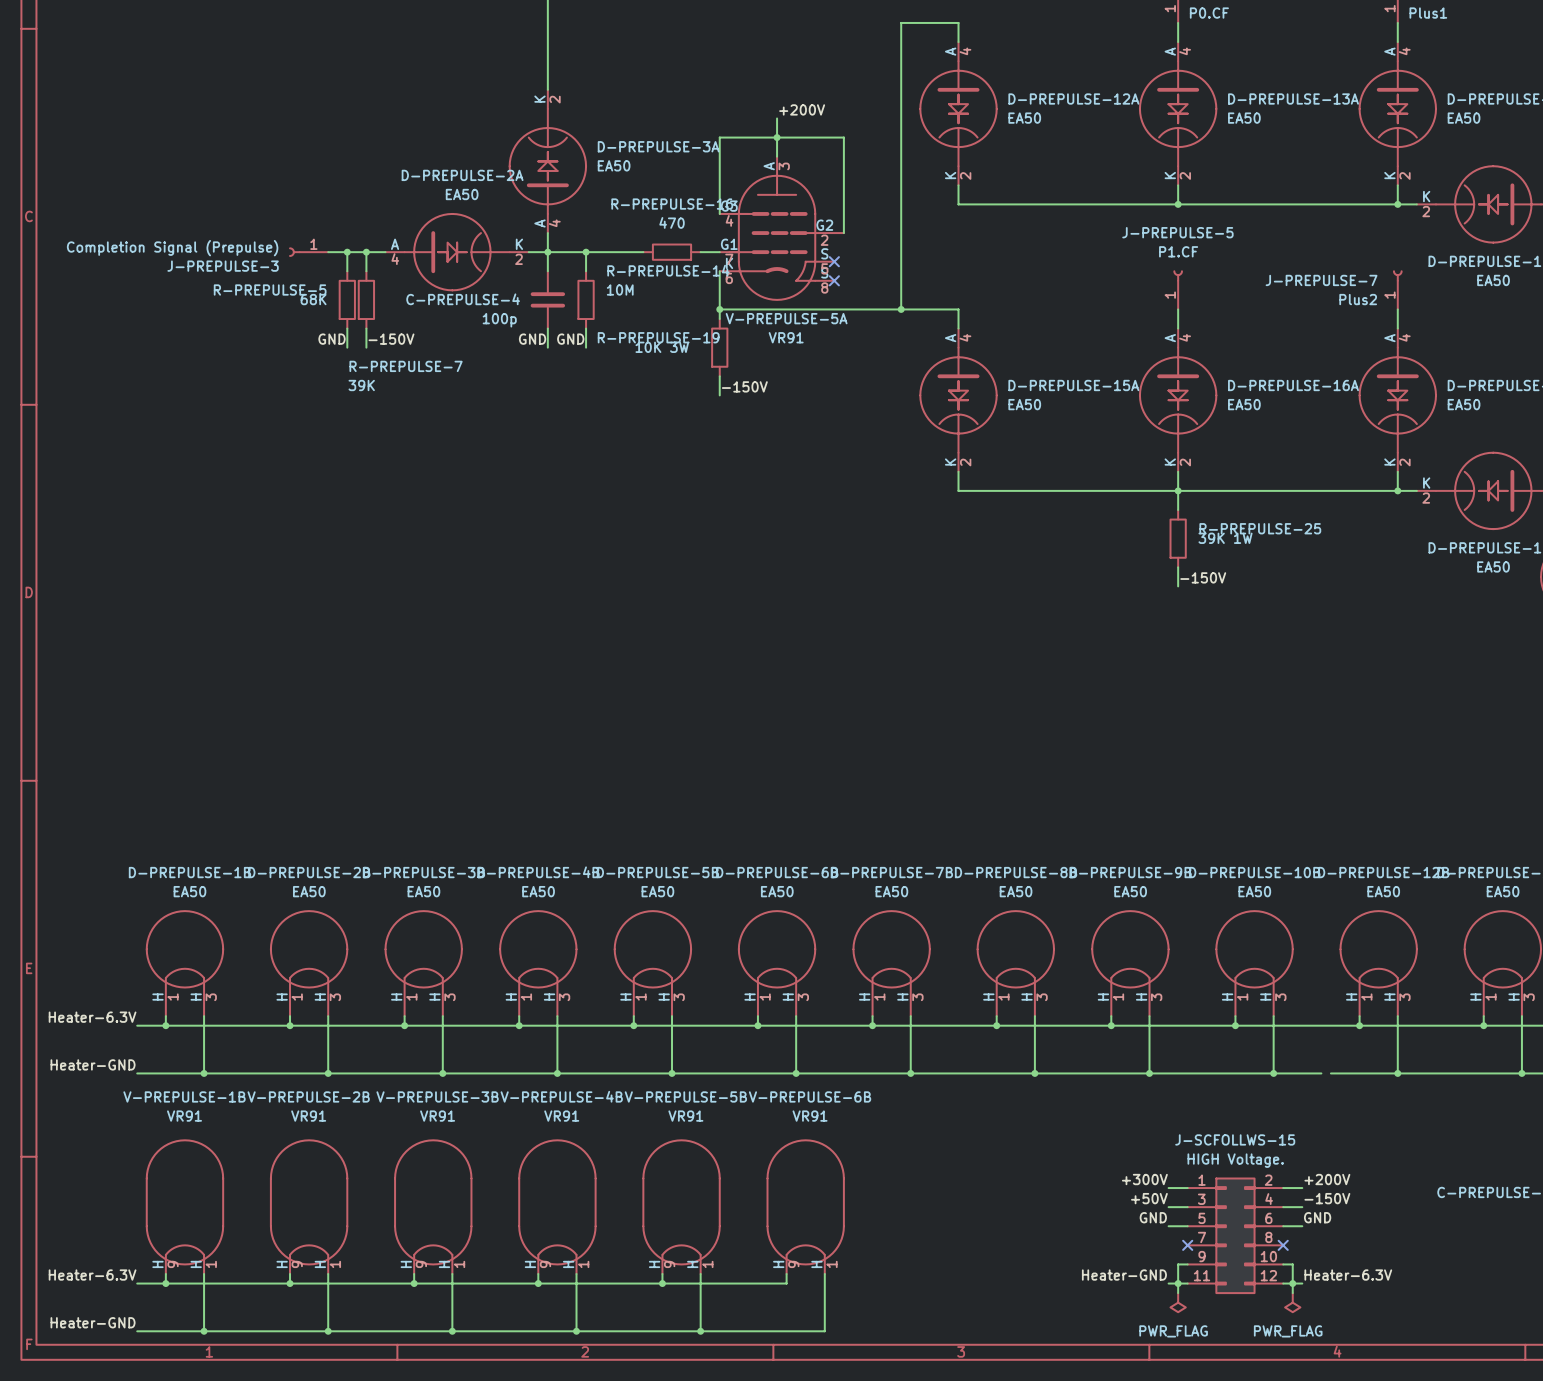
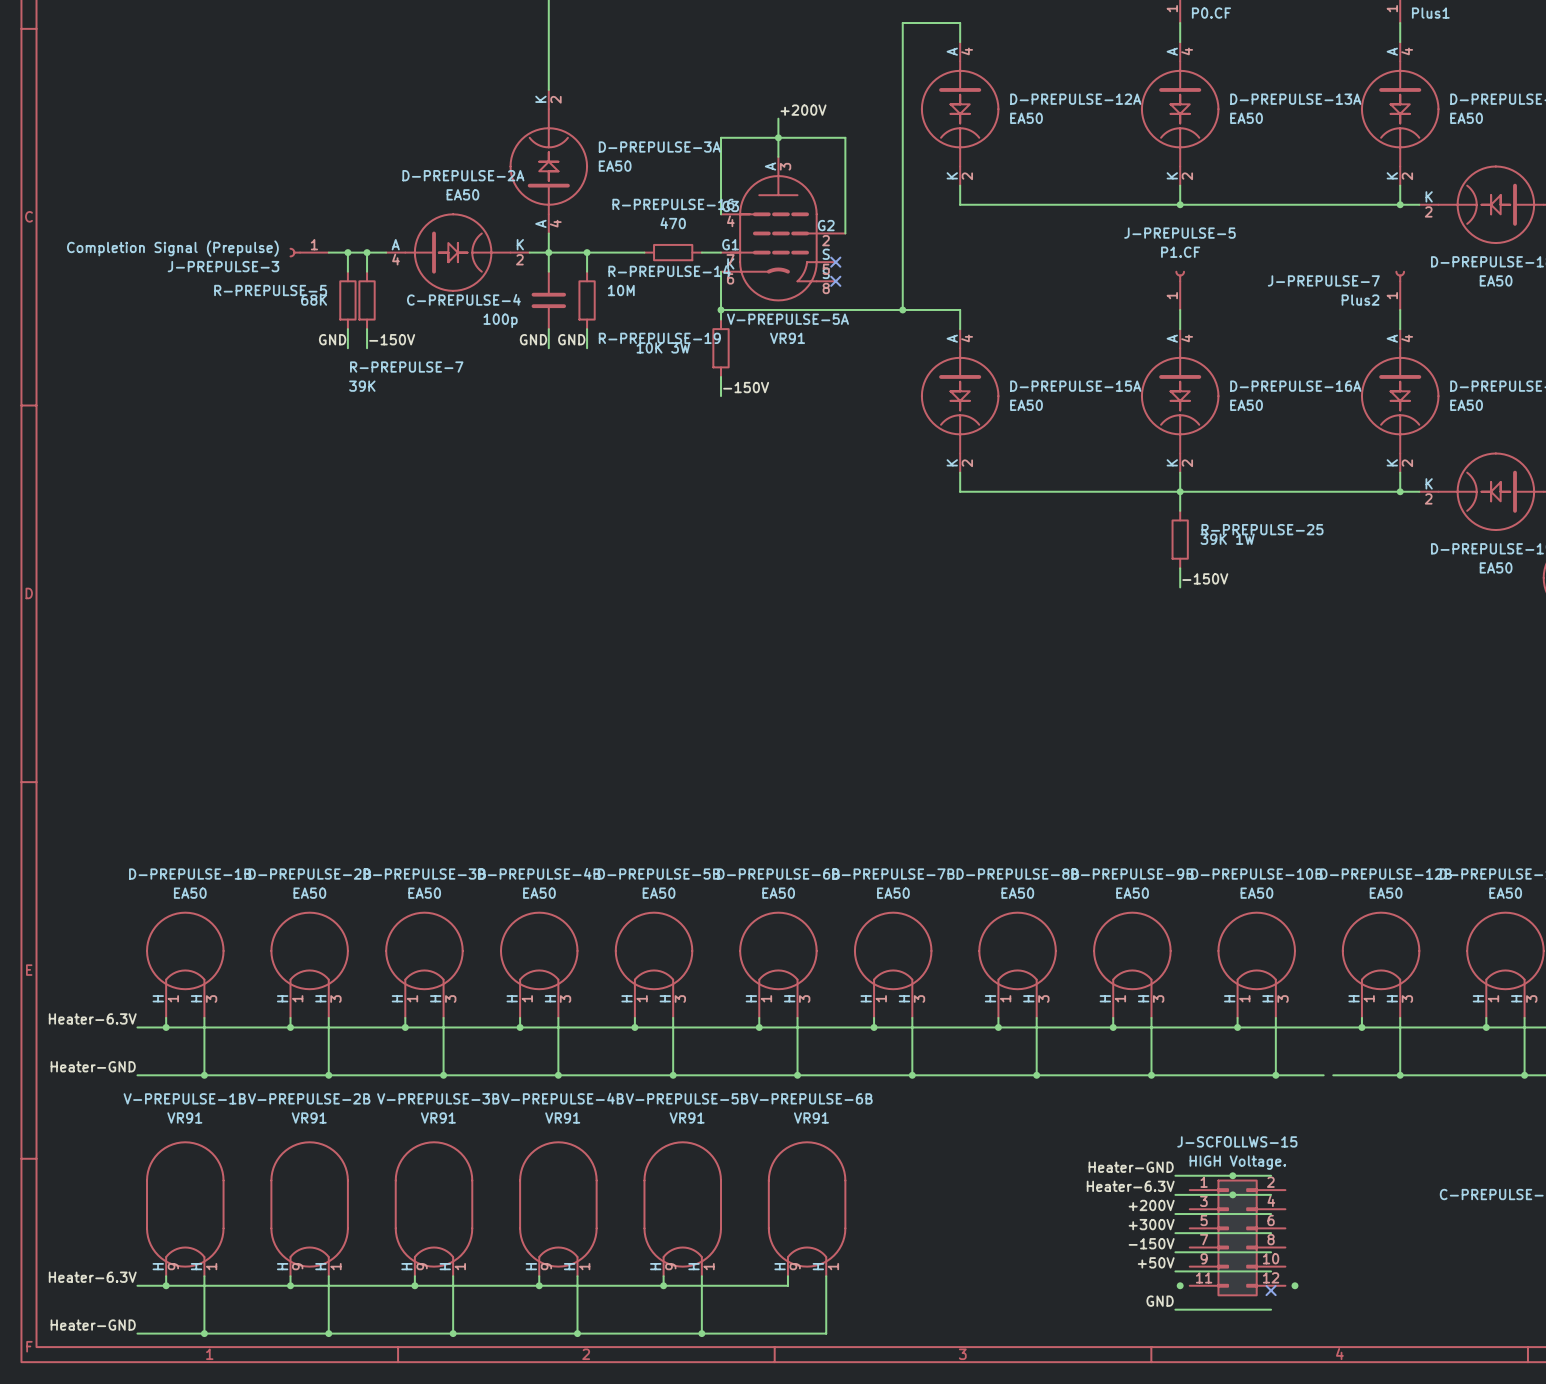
wire: none -> (1175, 1175) (1271, 1175)
junction: none -> (1232, 1175)
label position: +300V (1144, 1179) -> +300V (1151, 1224)
label position: +200V (1327, 1179) -> +200V (1151, 1205)
wire: (1168, 1188) (1187, 1188) -> none
wire: (1283, 1188) (1302, 1188) -> none
wire: none -> (1175, 1194) (1271, 1194)
junction: none -> (1232, 1194)
label position: +50V (1149, 1198) -> +50V (1156, 1262)
label position: -150V (1327, 1198) -> -150V (1151, 1243)
wire: (1168, 1207) (1187, 1207) -> none
wire: (1283, 1207) (1302, 1207) -> none
wire: none -> (1175, 1214) (1271, 1214)
label: GND (1153, 1217) -> none
label: GND (1317, 1217) -> none
wire: (1168, 1226) (1187, 1226) -> none
wire: (1283, 1226) (1302, 1226) -> none
wire: none -> (1175, 1233) (1271, 1233)
no-connect mark: (1187, 1245) -> none
no-connect mark: (1283, 1245) -> none
wire: none -> (1175, 1252) (1271, 1252)
wire: (1187, 1264) (1178, 1264) (1178, 1293) -> none
wire: (1283, 1264) (1292, 1264) (1292, 1293) -> none
wire: none -> (1175, 1271) (1271, 1271)
label position: Heater-GND (1124, 1275) -> Heater-GND (1131, 1167)
label position: Heater-6.3V (1348, 1275) -> Heater-6.3V (1130, 1186)
wire: (1168, 1283) (1187, 1283) -> none
wire: (1283, 1283) (1302, 1283) -> none
no-connect mark: none -> (1271, 1290)
label: none -> GND (1160, 1301)
power symbol: PWR_FLAG (1178, 1302) -> none
power symbol: PWR_FLAG (1292, 1302) -> none
wire: none -> (1175, 1309) (1271, 1309)

